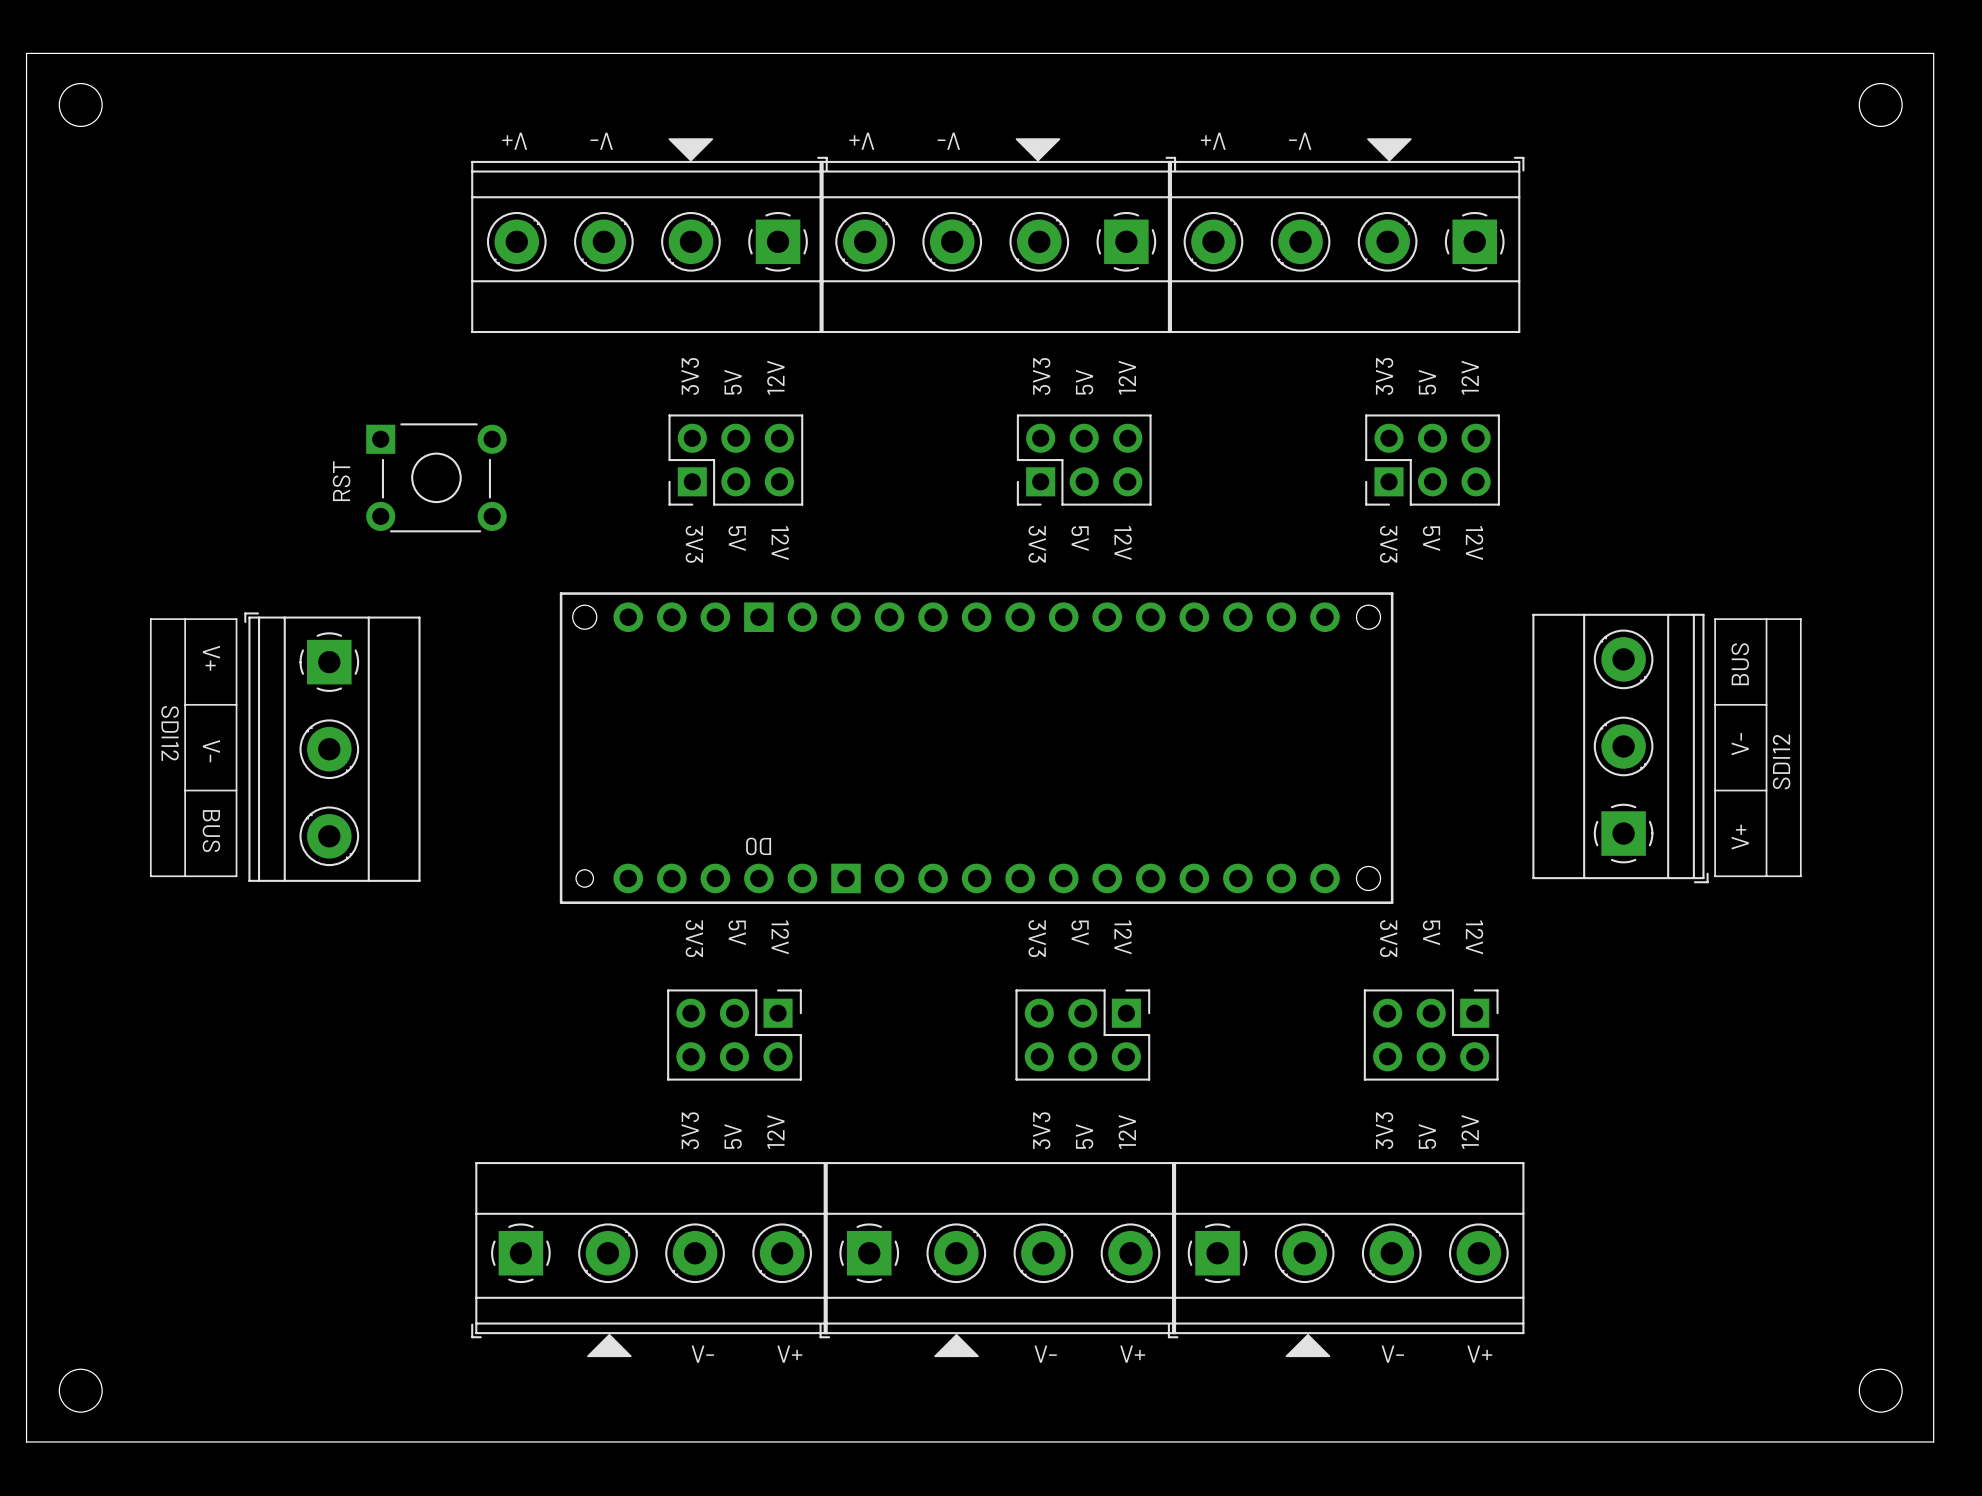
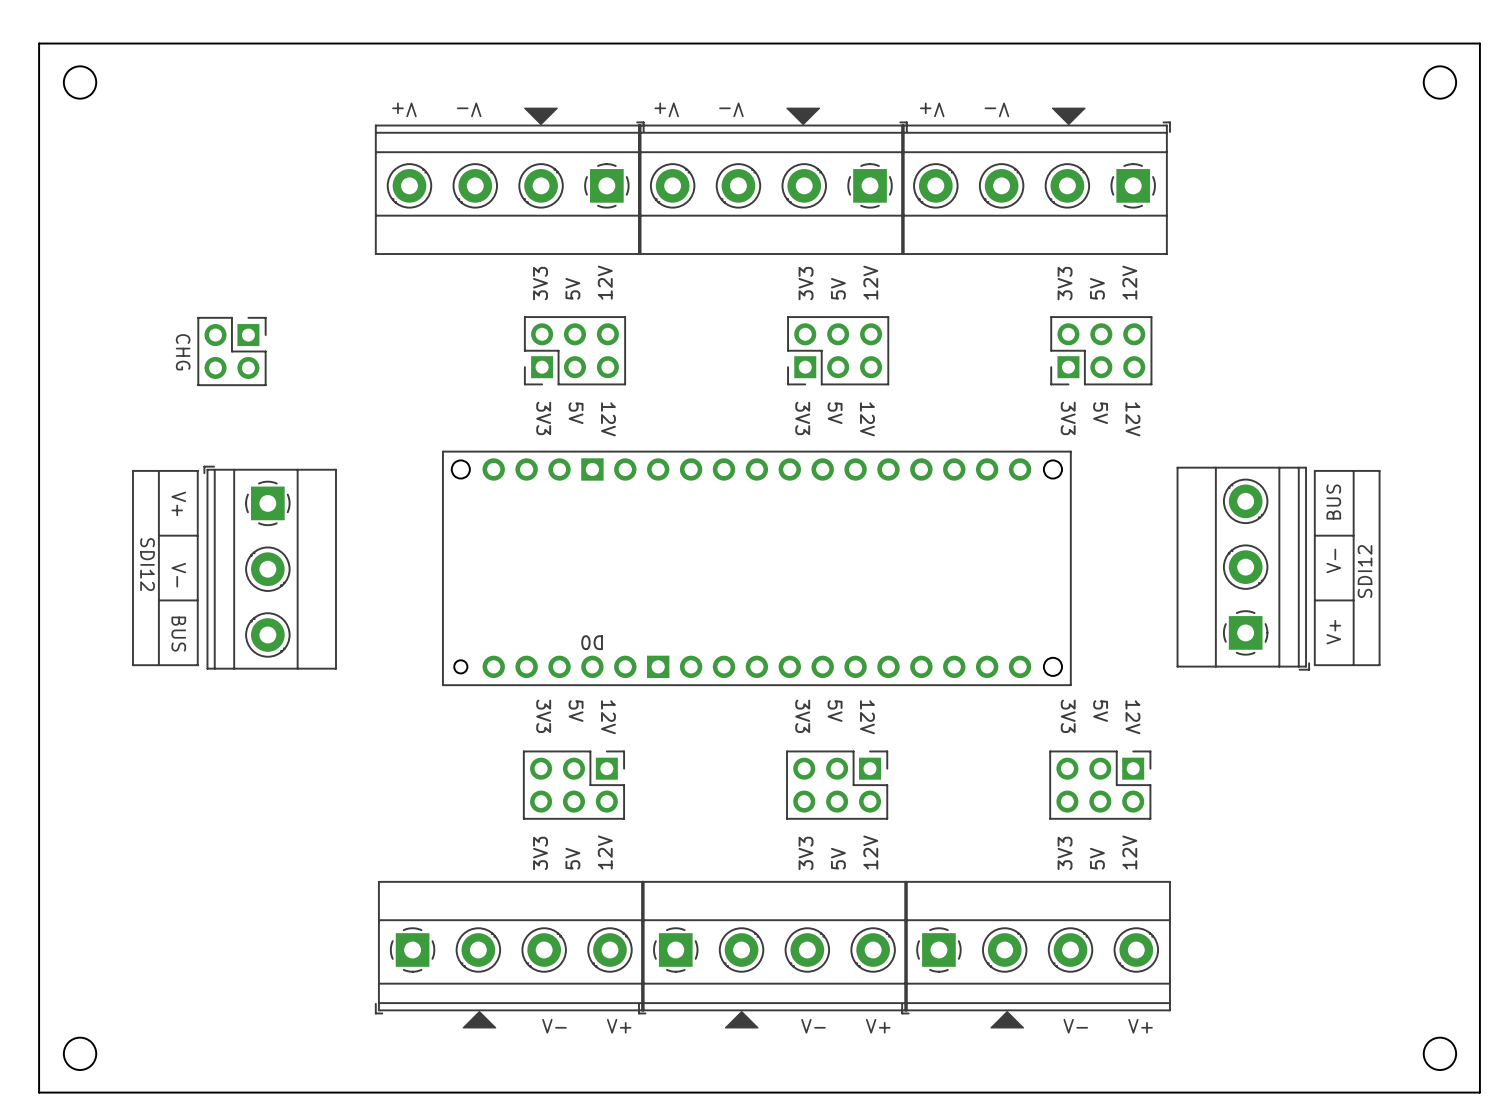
text: none -> CHG (183, 352)
part: none -> (231, 351)
part: (436, 477) -> none
text: RST (341, 481) -> none

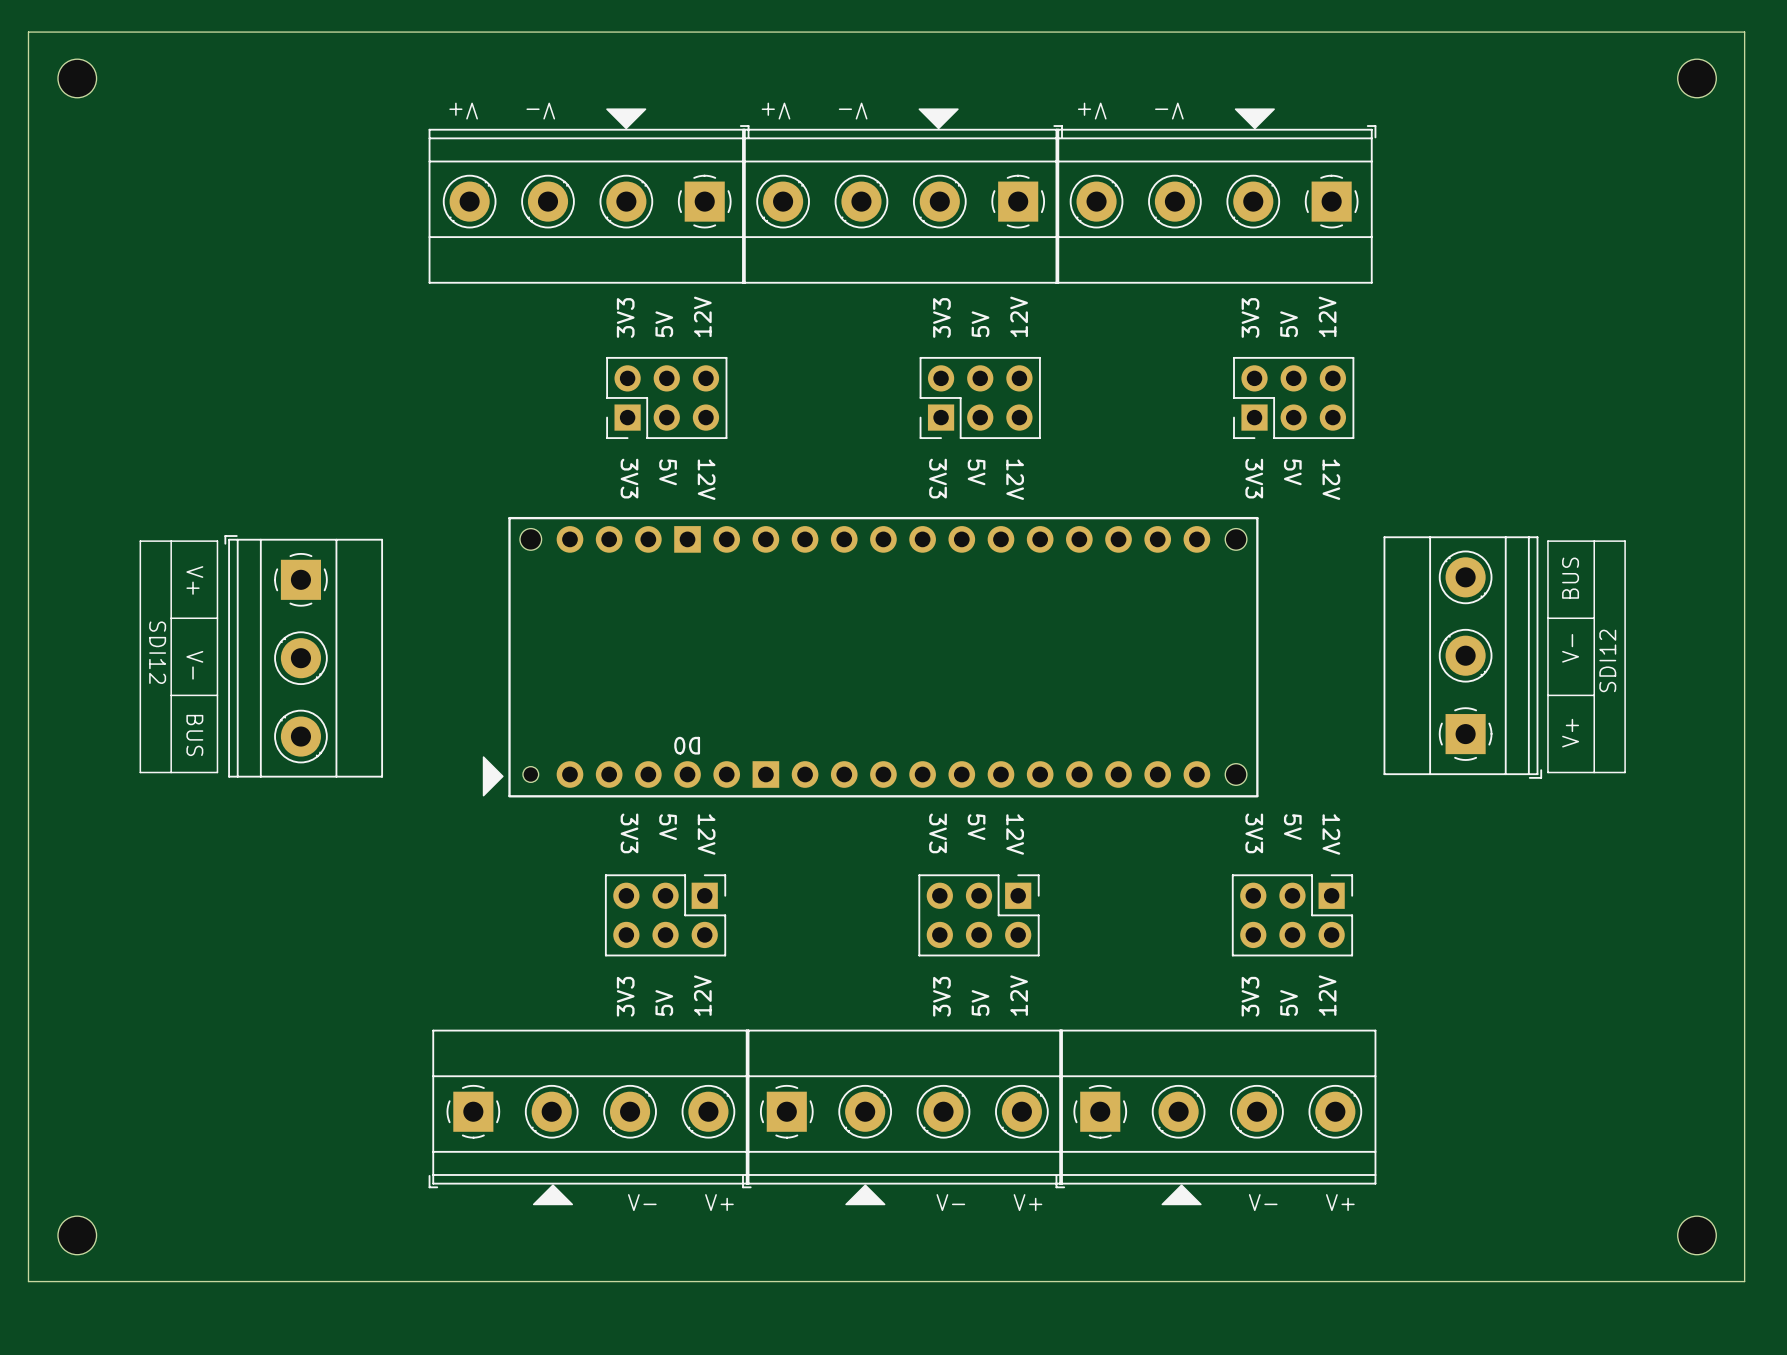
part: (231, 351) -> none
text: CHG (183, 352) -> none
drawing: none -> [482, 756, 504, 797]

